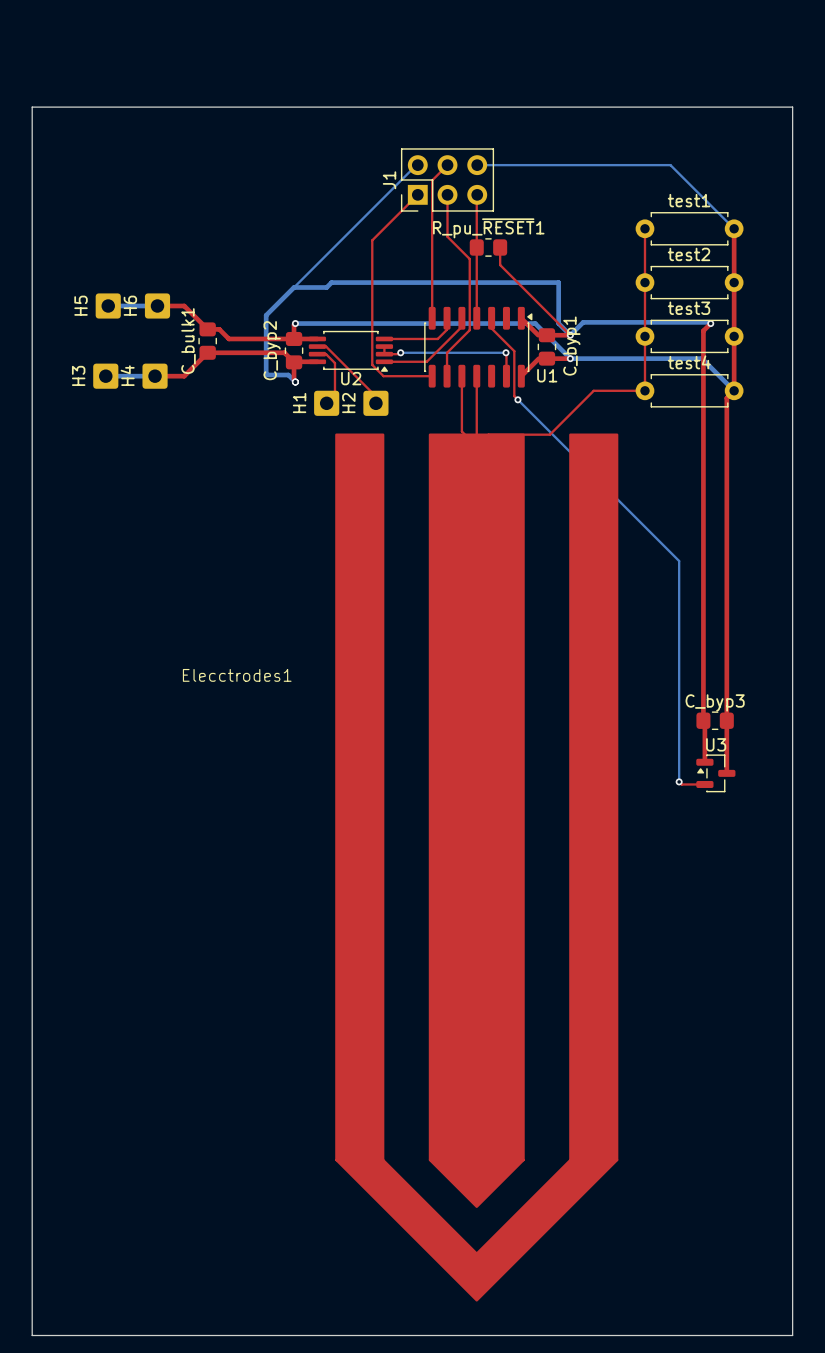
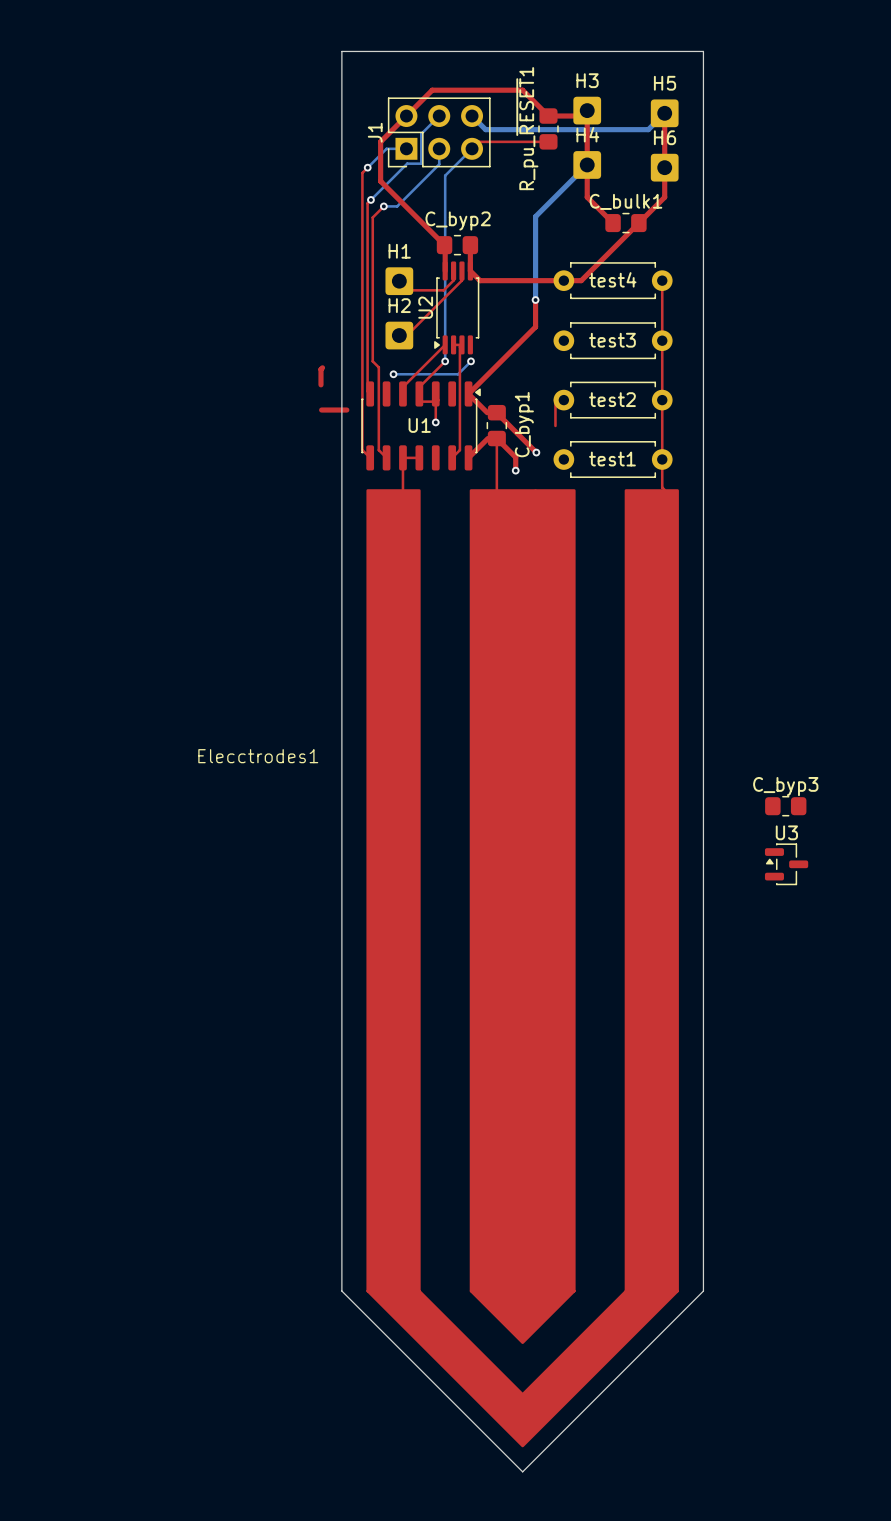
board edge: none -> (341, 51) (703, 51) (703, 1291) (522, 1471) (341, 1291) (341, 51)
top track: none -> (664, 113) (664, 197) (581, 280) (480, 280) (470, 270) (470, 245)
bottom track: none -> (664, 113) (648, 129) (485, 129) (472, 116)
bottom track: none -> (439, 116) (421, 133) (421, 163) (407, 163) (370, 199)
board edge: (32, 107) (792, 107) (792, 1335) (32, 1335) (32, 107) -> none
top track: none -> (548, 141) (479, 141) (471, 149)
bottom track: none -> (406, 148) (386, 148) (367, 167)
bottom track: none -> (439, 148) (439, 164) (397, 206) (383, 206) (383, 204)
bottom track: none -> (472, 148) (445, 175) (445, 361)
bottom track: none -> (587, 164) (535, 216) (535, 300)
top track: none -> (367, 167) (362, 172) (362, 450) (370, 457)
via: none -> (367, 167)
bottom track: (417, 165) (294, 287) -> none
top track: (447, 165) (432, 180) (432, 318) -> none
bottom track: (477, 165) (670, 165) (734, 228) -> none
top track: none -> (370, 199) (367, 203) (367, 391) (370, 393)
via: none -> (370, 199)
top track: none -> (383, 206) (372, 217) (372, 361) (378, 367) (378, 450) (386, 457)
via: none -> (383, 206)
J1 position: (447, 179) -> (439, 132)
top track: none -> (613, 223) (587, 197) (587, 110) (581, 116) (548, 116) (522, 90) (432, 90) (380, 141) (380, 181) (445, 245) (445, 270)
top track: (417, 194) (372, 240) (372, 364) (383, 376) (432, 376) -> none
top track: (447, 194) (447, 236) (469, 259) (469, 330) (447, 352) (447, 376) -> none
top track: (477, 194) (476, 318) -> none
test1 name position: test1 (689, 200) -> test1 (612, 459)
R_pu_~{RESET}1 name position: R_pu_~{RESET}1 (488, 228) -> R_pu_~{RESET}1 (527, 128)
top track: (644, 228) (644, 390) -> none
test1 position: (689, 228) -> (613, 459)
top track: (734, 228) (734, 390) (726, 398) (726, 773) -> none
top track: none -> (453, 270) (453, 280) (443, 290) (408, 290) (399, 281)
top track: none -> (461, 270) (461, 280) (406, 335) (399, 335)
top track: none -> (664, 278) (662, 280) (662, 487) (664, 489)
R_pu_~{RESET}1 rotation: 0° (488, 247) -> 90° clockwise (548, 128)
R_pu_~{RESET}1 position: (488, 247) -> (548, 128)
top track: (500, 247) (500, 265) (570, 335) (538, 335) (521, 318) -> none
test2 name position: test2 (689, 254) -> test2 (612, 399)
top track: none -> (535, 300) (535, 326) (468, 393) (487, 412) (496, 412) (536, 452)
via: none -> (535, 300)
test2 position: (689, 282) -> (613, 400)
bottom track: (294, 287) (266, 315) (266, 375) (288, 375) (295, 382) -> none
bottom track: (294, 287) (326, 287) (331, 282) (558, 282) (558, 323) (570, 335) (583, 322) (710, 323) -> none
top track: none -> (445, 344) (402, 387) (402, 403)
top track: none -> (453, 344) (461, 344) (459, 346) (459, 450) (452, 457)
H5 name rotation: 0° (81, 305) -> 90° clockwise (665, 83)
H5 name position: H5 (81, 305) -> H5 (665, 83)
bottom track: (108, 305) (157, 305) -> none
H5 position: (108, 305) -> (664, 113)
H6 name rotation: 0° (130, 305) -> 90° clockwise (665, 137)
H6 name position: H6 (130, 305) -> H6 (665, 137)
top track: (157, 305) (184, 305) (207, 329) (219, 329) (228, 338) (317, 338) -> none
H6 position: (157, 305) -> (664, 167)
test3 name position: test3 (689, 308) -> test3 (612, 340)
top track: none -> (445, 361) (419, 387) (419, 393)
via: none -> (445, 361)
bottom track: none -> (471, 361) (458, 374) (393, 374)
via: none -> (471, 361)
top track: (447, 318) (447, 329) (437, 338) (384, 338) -> none
top track: (461, 318) (461, 326) (426, 361) (384, 361) -> none
top track: (491, 318) (491, 328) (514, 351) (514, 396) (517, 399) -> none
bottom track: (295, 323) (535, 323) (570, 358) (701, 358) (734, 390) -> none
via: (295, 323) -> none
top track: (710, 323) (703, 330) (704, 762) -> none
via: (710, 323) -> none
via: none -> (393, 374)
via: (570, 335) -> none
test3 position: (689, 336) -> (613, 340)
C_bulk1 rotation: 0° (207, 341) -> 90° clockwise (625, 223)
C_bulk1 position: (207, 341) -> (625, 223)
top track: (317, 346) (326, 346) (375, 396) (375, 403) -> none
C_byp1 position: (546, 346) -> (496, 425)
top track: none -> (435, 393) (435, 422)
U1 position: (478, 347) -> (421, 425)
C_byp2 rotation: 0° (294, 350) -> 90° clockwise (457, 245)
C_byp2 position: (294, 350) -> (457, 245)
U2 rotation: 0° (350, 351) -> 90° clockwise (456, 307)
U2 position: (350, 351) -> (456, 307)
bottom track: (400, 352) (506, 352) -> none
via: (400, 352) -> none
via: (506, 352) -> none
top track: (317, 354) (326, 354) (334, 363) (334, 395) (326, 403) -> none
top track: (570, 358) (538, 358) (521, 376) -> none
via: (570, 358) -> none
test4 name position: test4 (689, 362) -> test4 (612, 279)
via: none -> (435, 422)
H3 name rotation: 0° (78, 375) -> 90° clockwise (587, 80)
H3 name position: H3 (78, 375) -> H3 (587, 80)
H4 name rotation: 0° (127, 375) -> 90° clockwise (587, 134)
H4 name position: H4 (127, 375) -> H4 (587, 134)
U1 name position: U1 (547, 375) -> U1 (419, 425)
bottom track: (105, 376) (155, 376) -> none
H3 position: (105, 376) -> (587, 110)
top track: (155, 376) (184, 376) (207, 352) (284, 352) (294, 362) (295, 382) -> none
H4 position: (155, 376) -> (587, 164)
top track: (461, 376) (461, 431) (476, 446) (476, 376) -> none
via: (295, 382) -> none
top track: none -> (496, 438) (497, 491)
top track: none -> (496, 438) (487, 438) (468, 457)
top track: none -> (496, 438) (515, 457) (515, 470)
top track: (644, 390) (593, 390) (549, 434) (488, 434) -> none
test4 position: (689, 390) -> (613, 280)
bottom track: (517, 399) (679, 561) (679, 781) -> none
via: (517, 399) -> none
via: none -> (536, 452)
H1 name rotation: 0° (299, 403) -> 90° clockwise (399, 251)
H1 name position: H1 (299, 403) -> H1 (399, 251)
H1 position: (326, 403) -> (399, 281)
H2 name rotation: 0° (348, 403) -> 90° clockwise (399, 305)
H2 name position: H2 (348, 403) -> H2 (399, 305)
H2 position: (375, 403) -> (399, 335)
top track: none -> (419, 457) (402, 457) (402, 492)
via: none -> (515, 470)
top track: (679, 781) (681, 784) (704, 784) -> none
via: (679, 781) -> none

